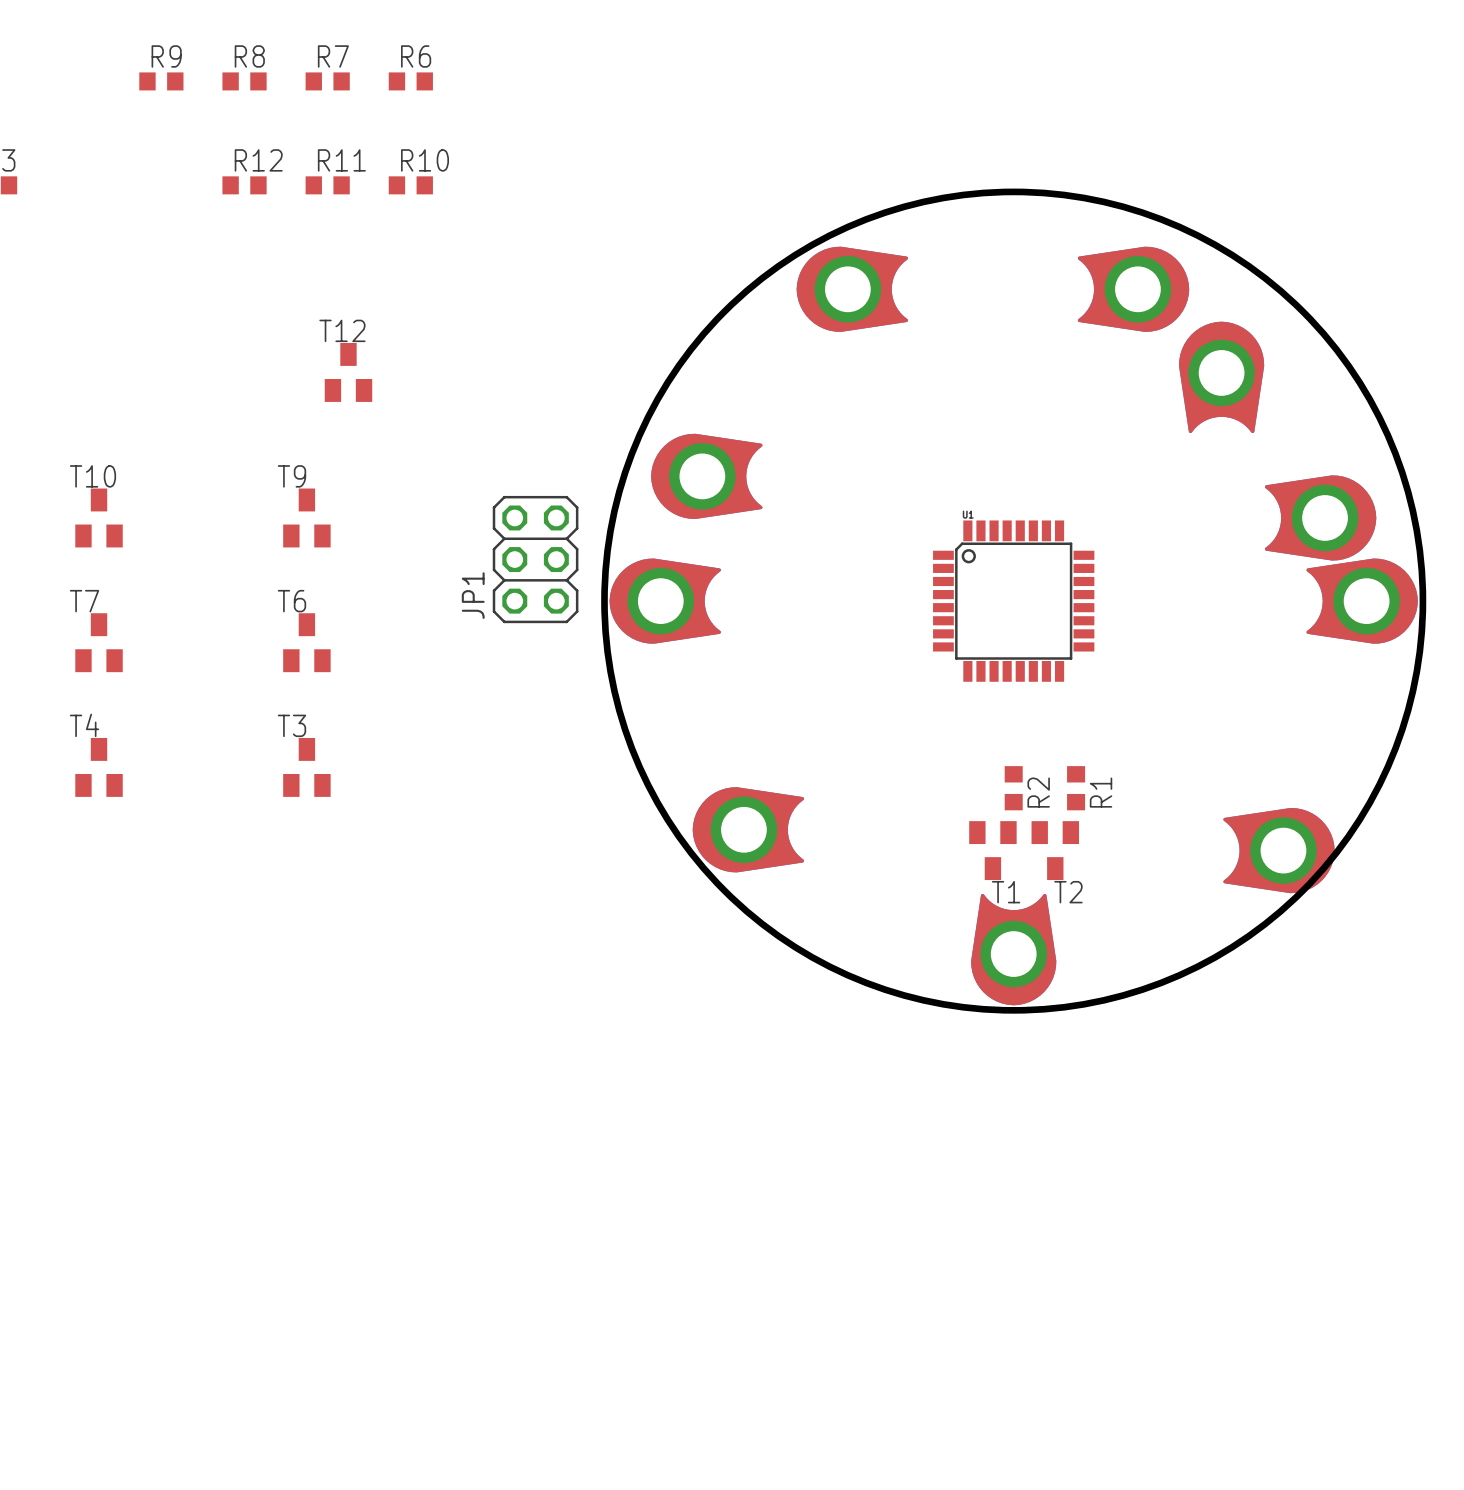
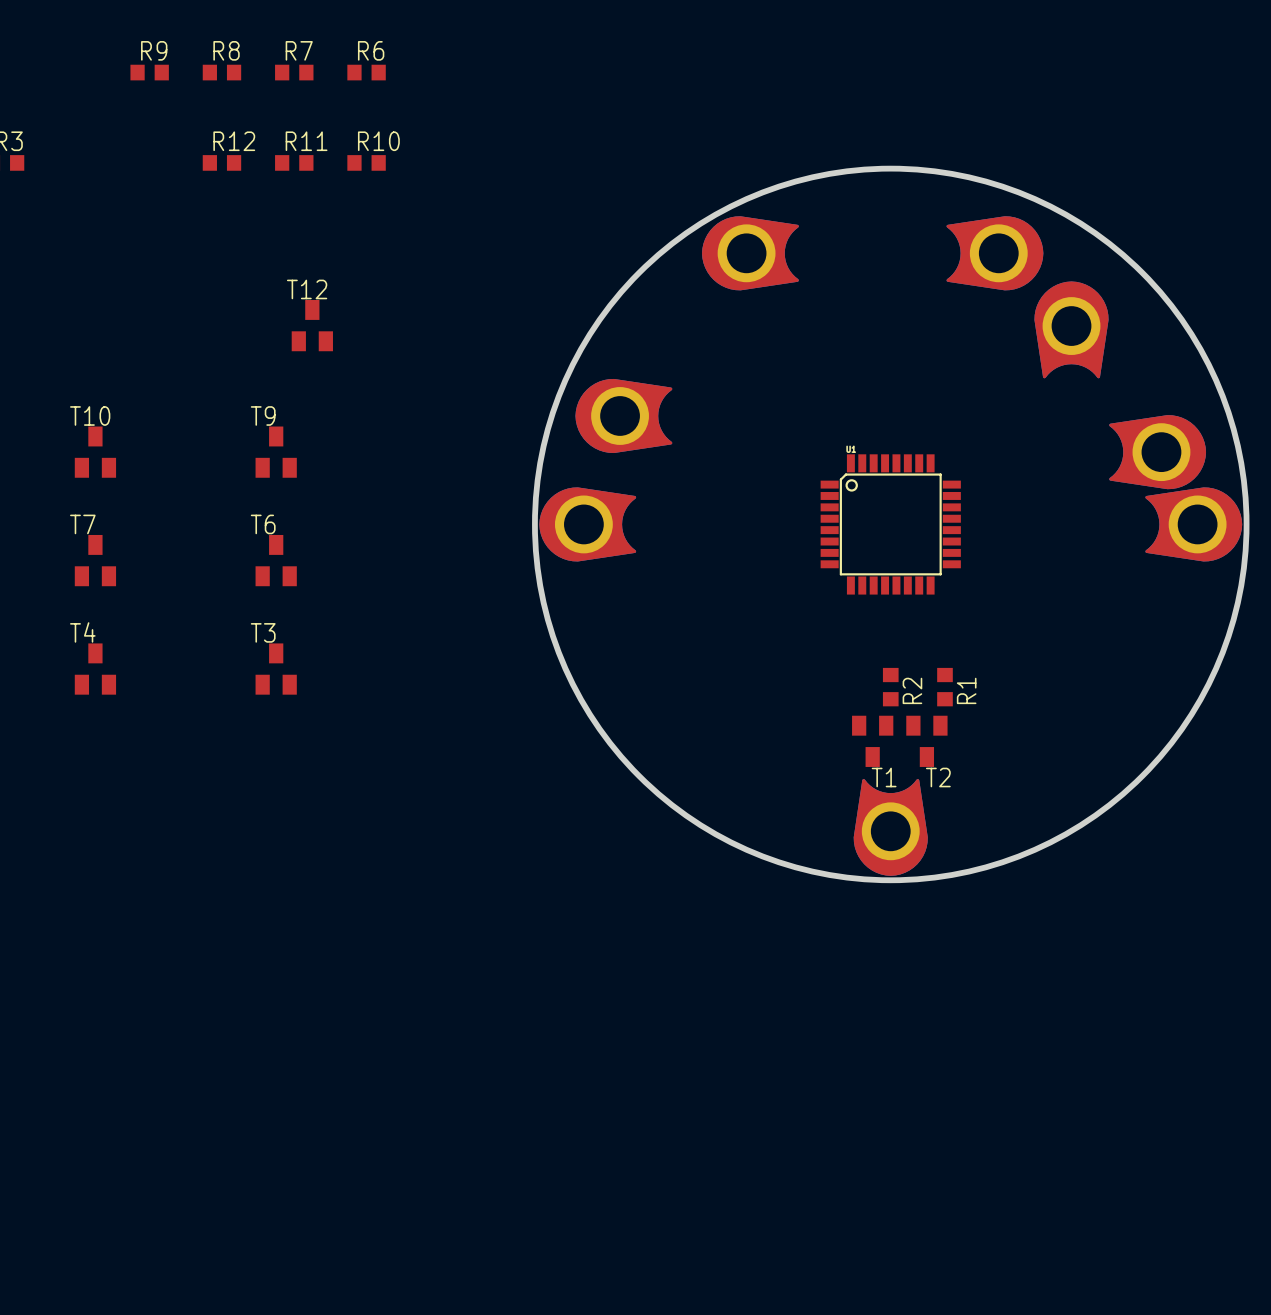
JP1: (535, 559) -> none
part: (748, 829) -> none
part: (1279, 850) -> none

